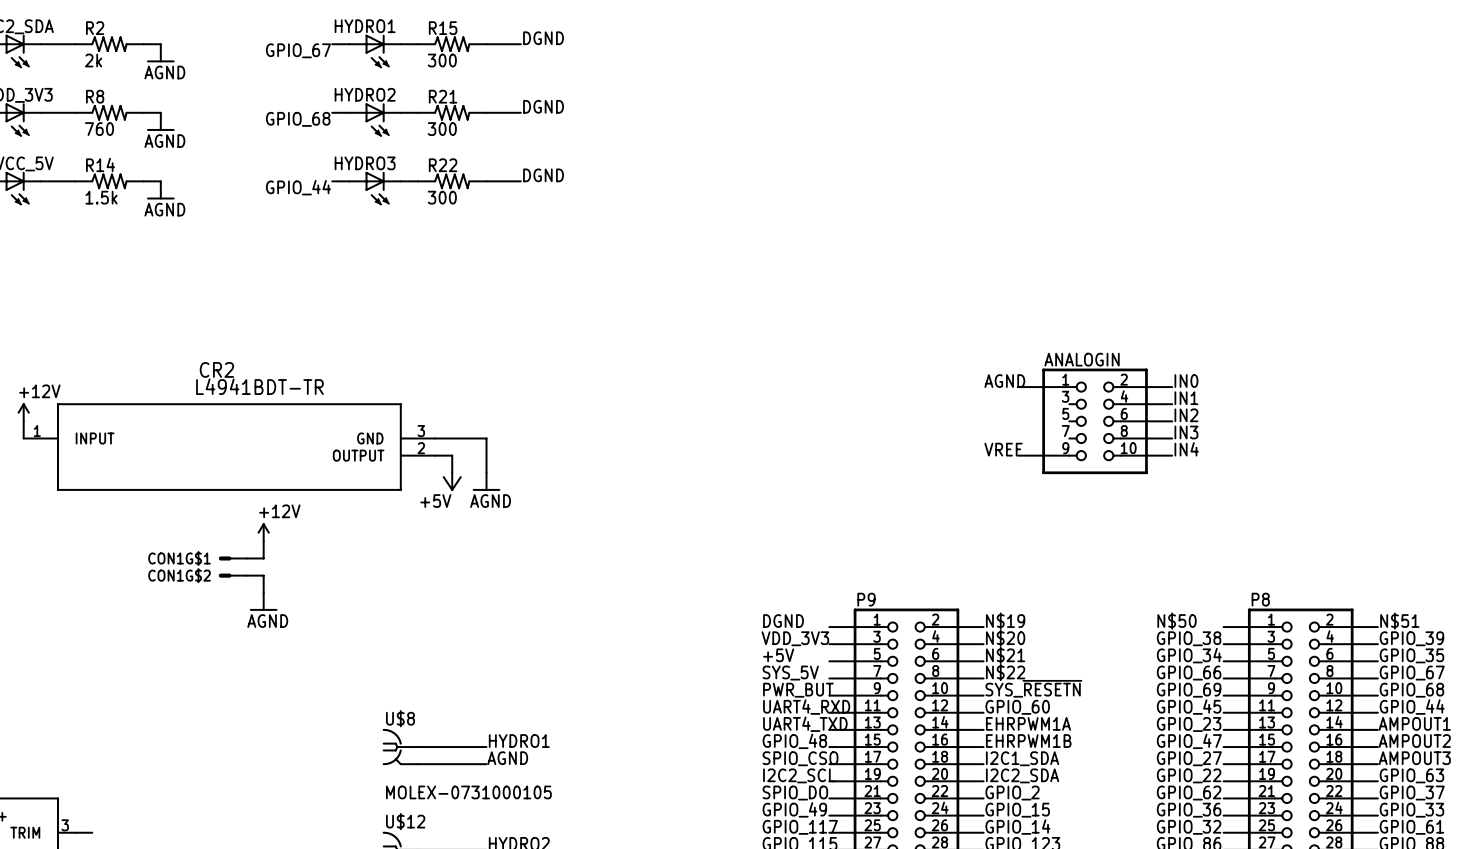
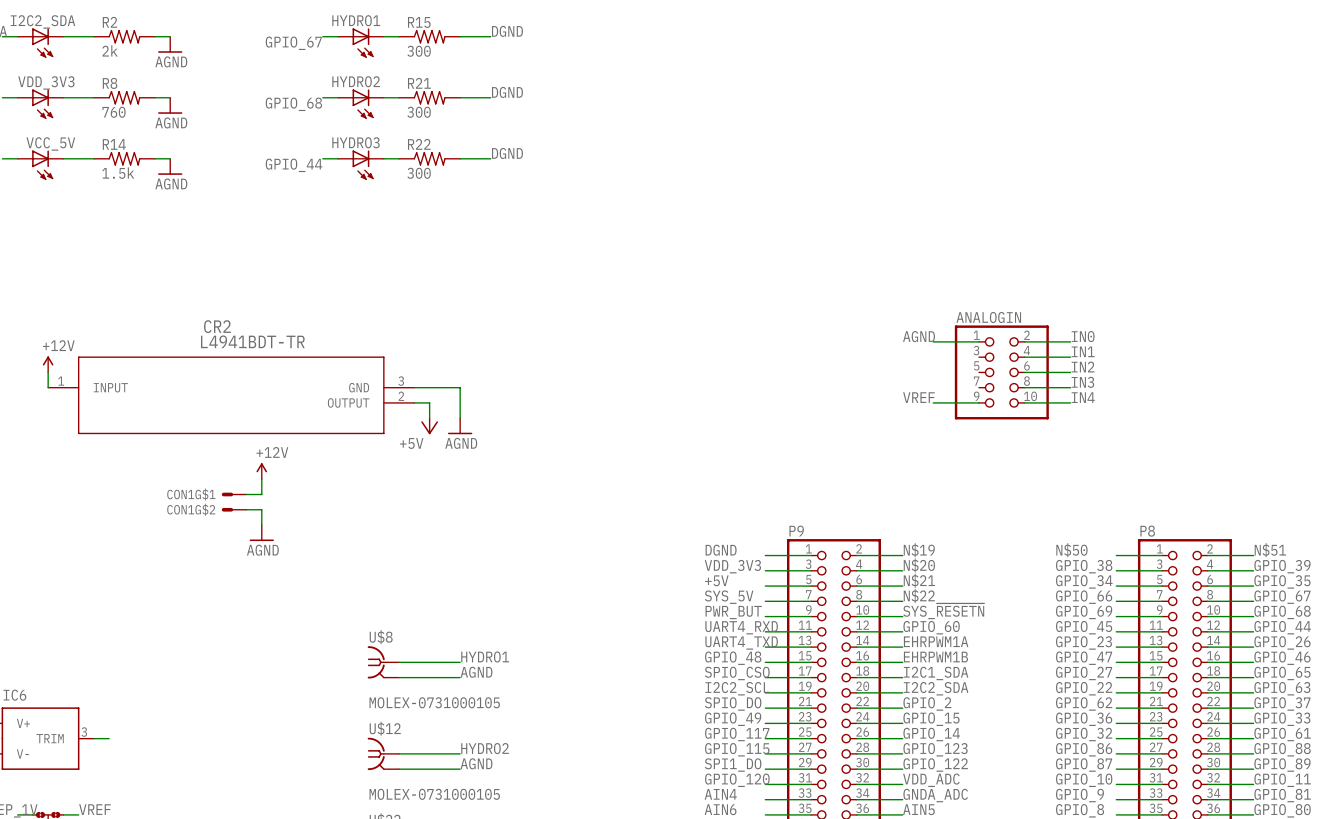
label: AMPOUT1 (1414, 723) -> GPIO_26 (1282, 642)
label: AMPOUT2 (1414, 741) -> GPIO_46 (1282, 658)
label: AMPOUT3 (1414, 758) -> GPIO_65 (1282, 673)

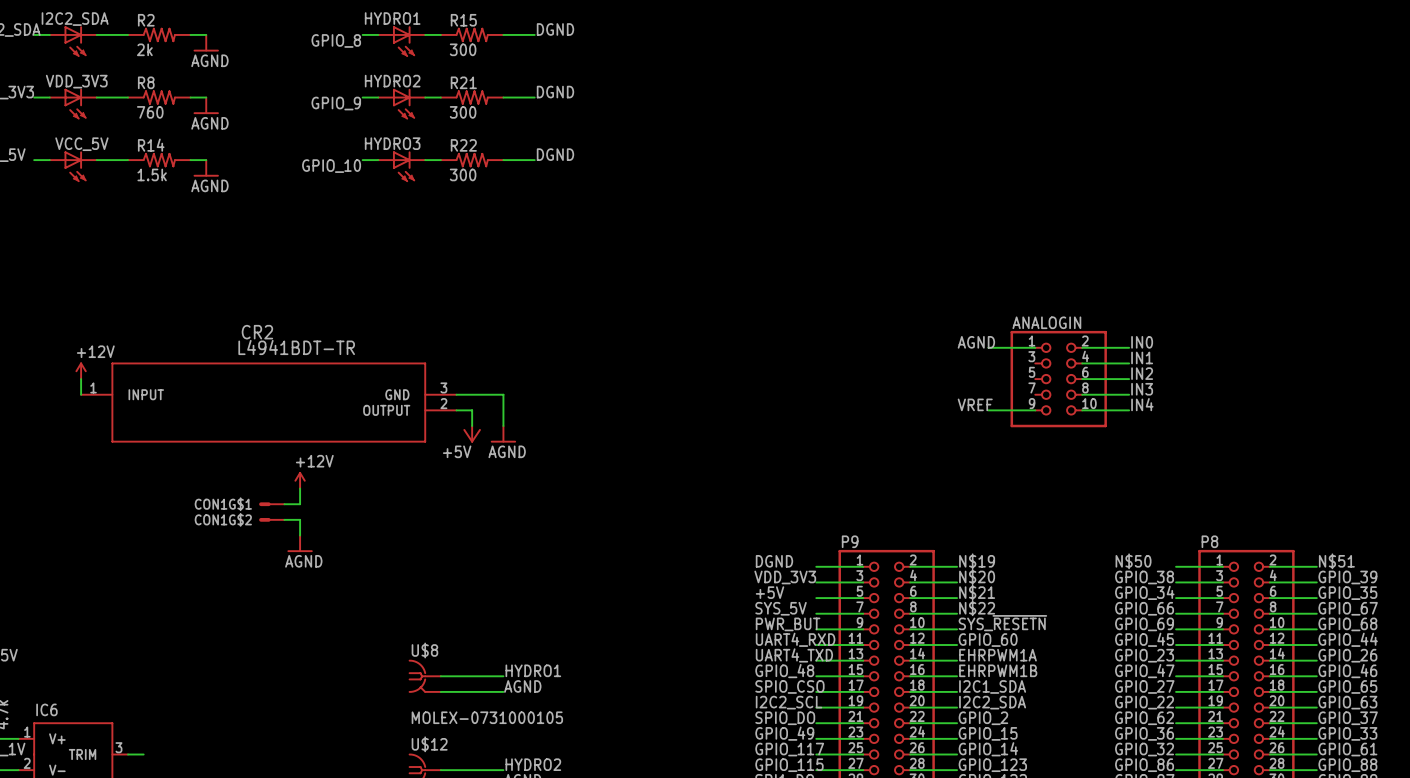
label: GPIO_67 (293, 43) -> GPIO_8 (336, 40)
label: GPIO_68 (293, 104) -> GPIO_9 (336, 103)
label: GPIO_44 (294, 165) -> GPIO_10 (331, 166)

